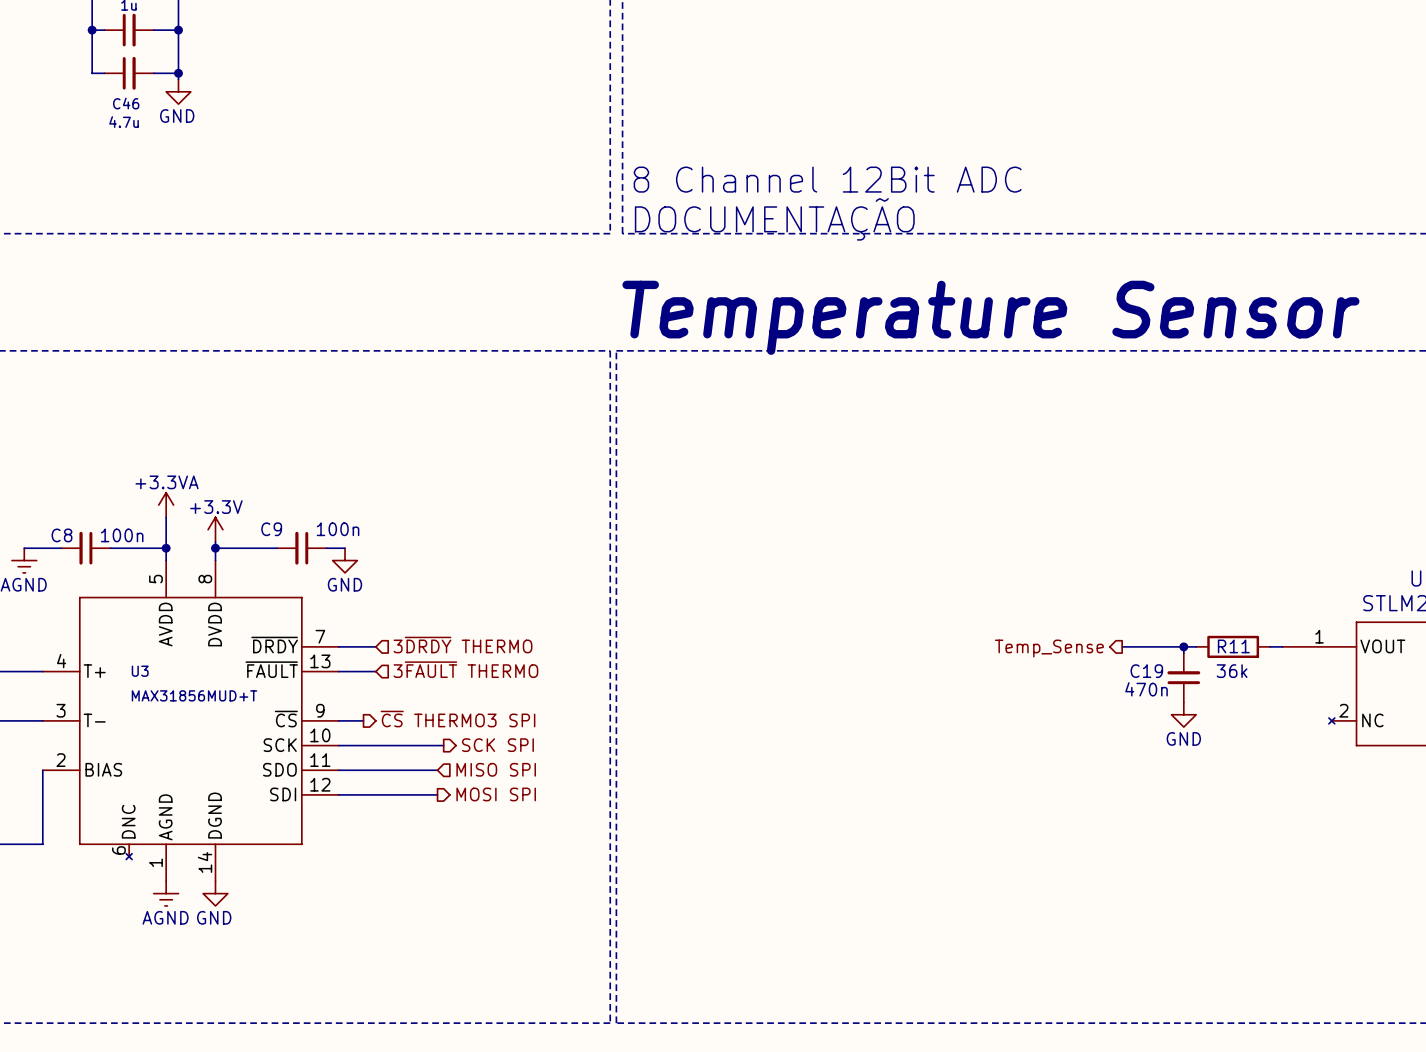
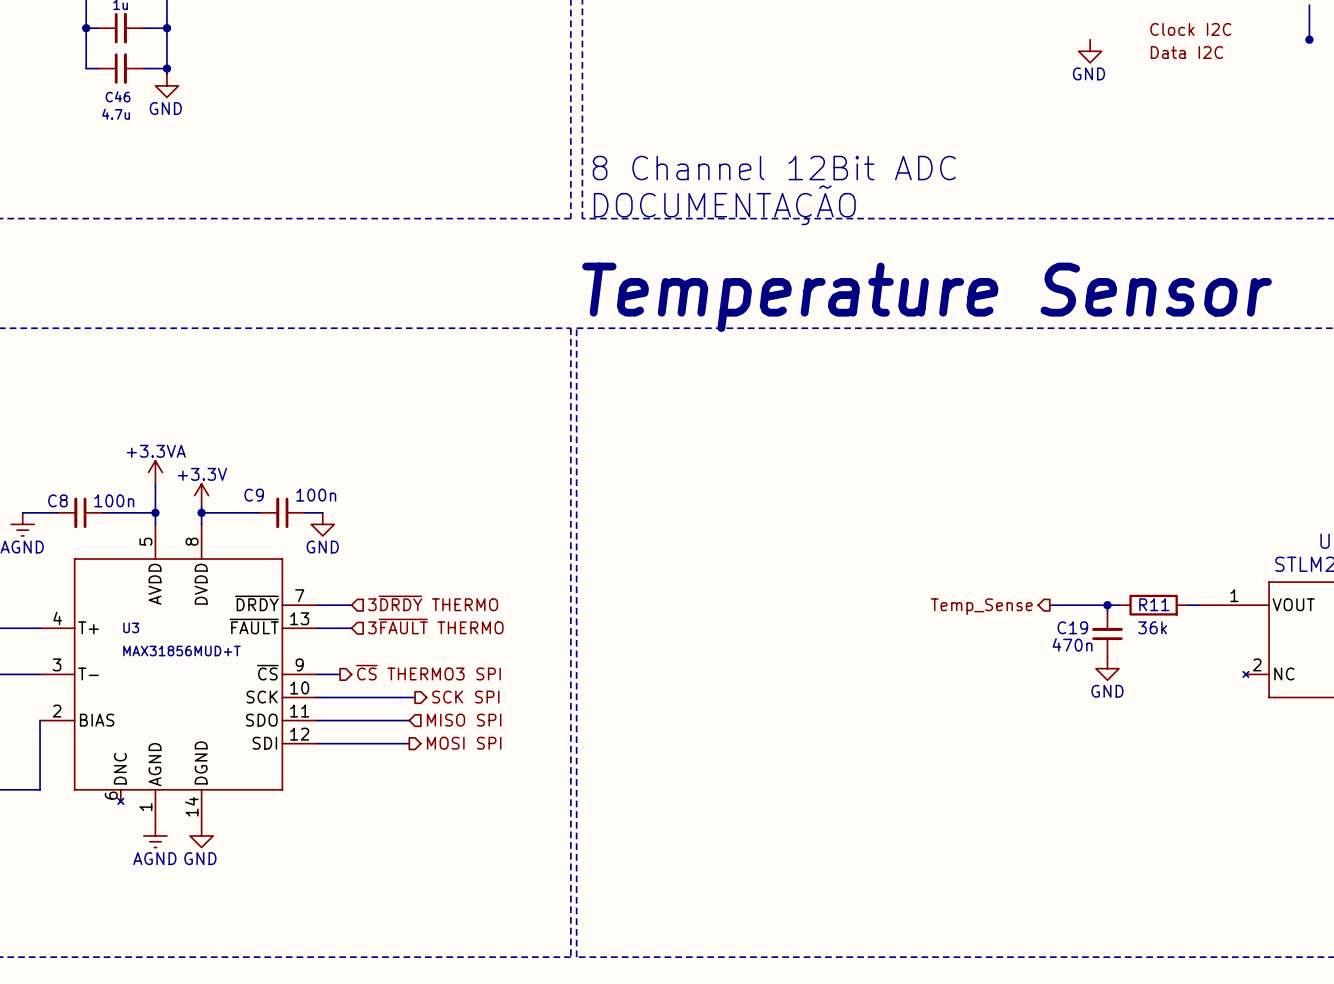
wire: none -> (1309, 5) (1309, 39)
label: none -> Clock I2C (1190, 29)
junction: none -> (1309, 39)
power symbol: none -> GND (1090, 51)
label: none -> Data I2C (1186, 52)

